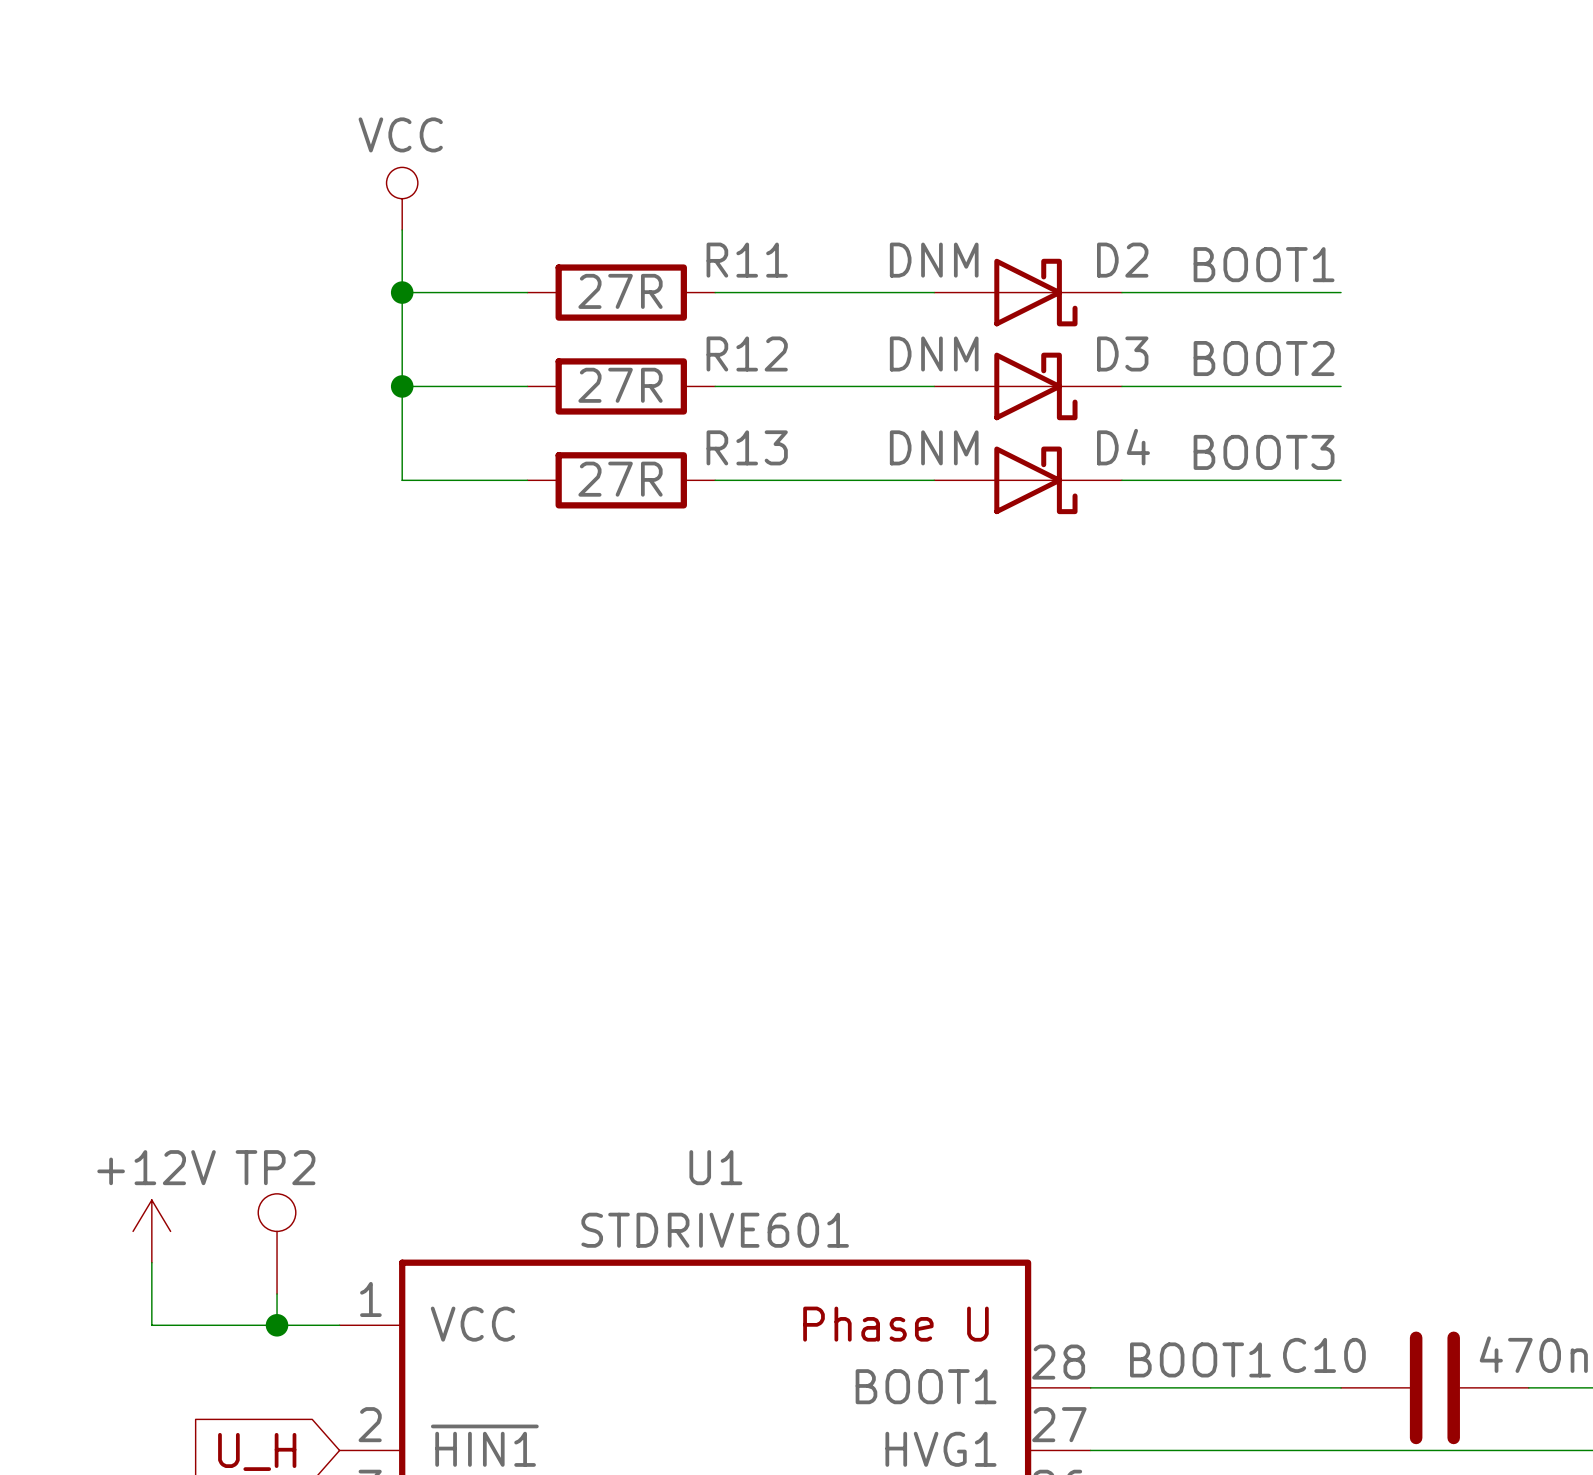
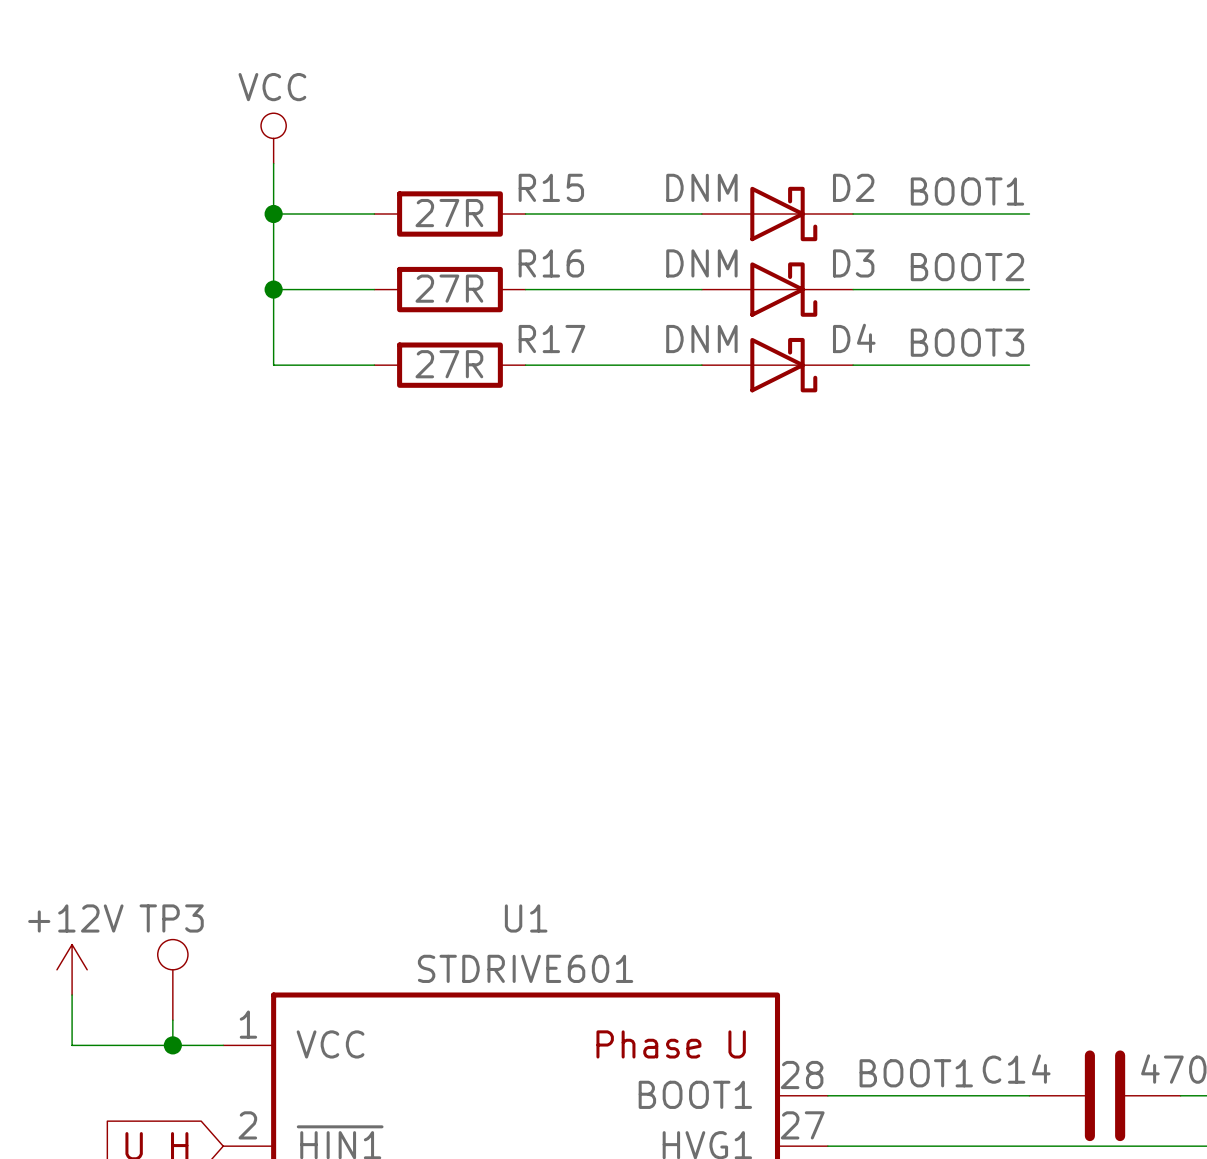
R11 name: R11 (747, 260) -> R15 (551, 187)
R12 name: R12 (747, 353) -> R16 (551, 263)
R13 name: R13 (747, 447) -> R17 (551, 339)
TP2 name: TP2 (275, 1167) -> TP3 (171, 918)
C10 name: C10 (1324, 1355) -> C14 (1016, 1069)

